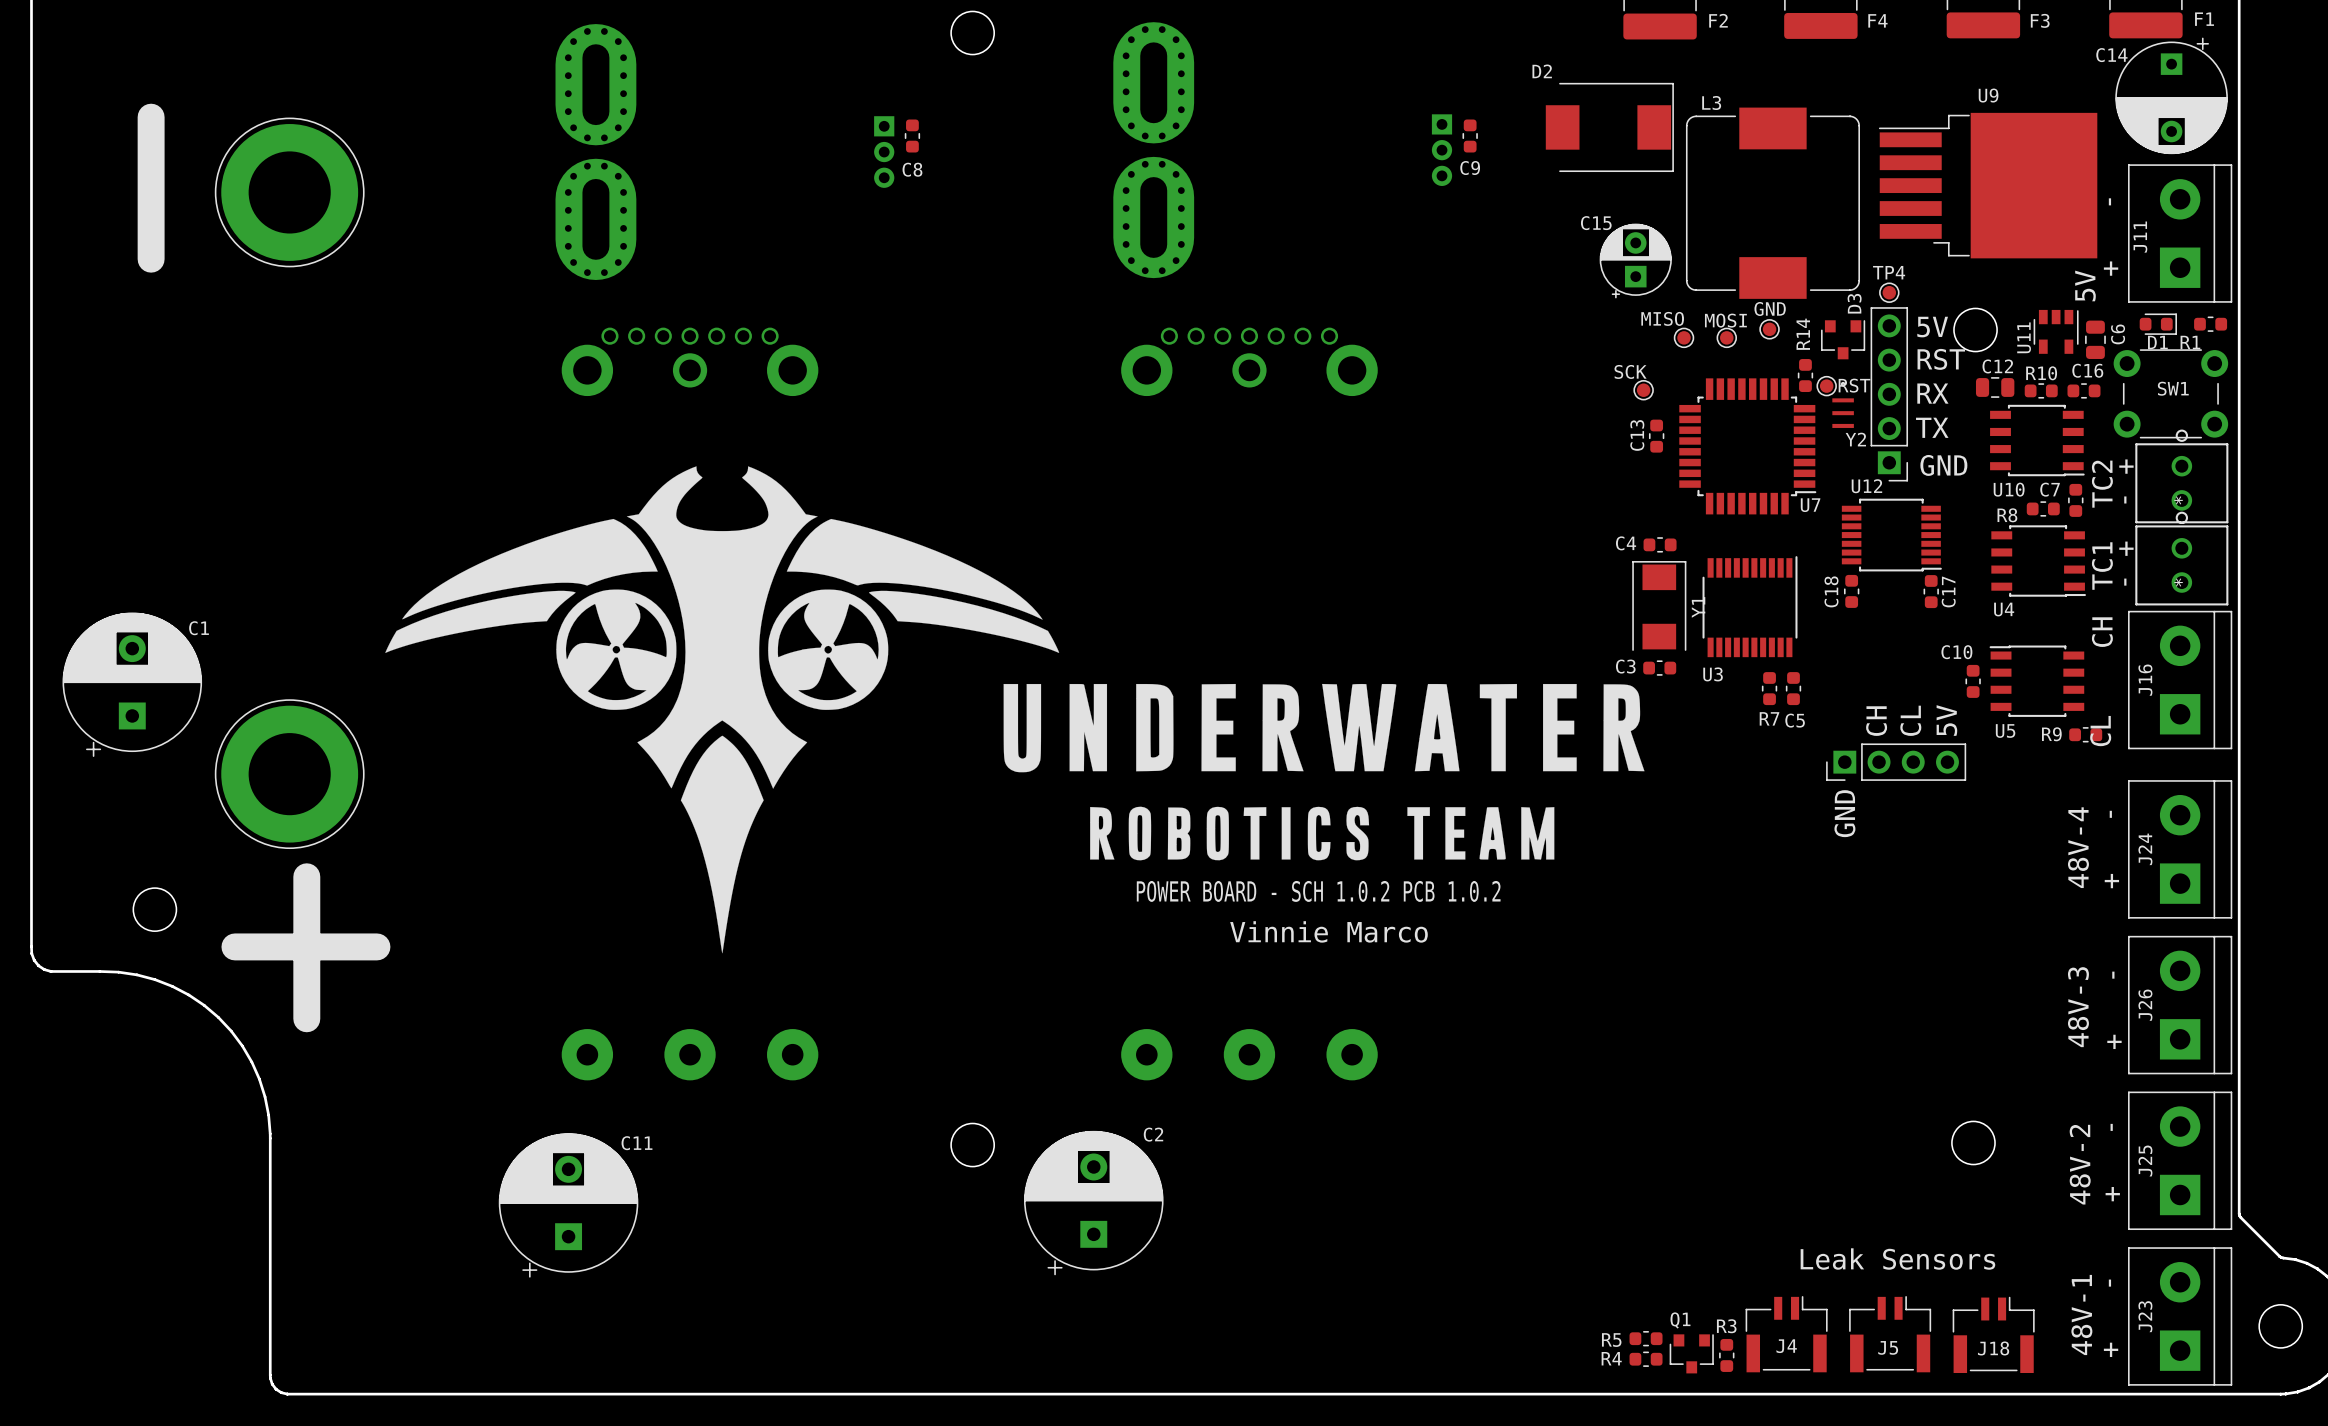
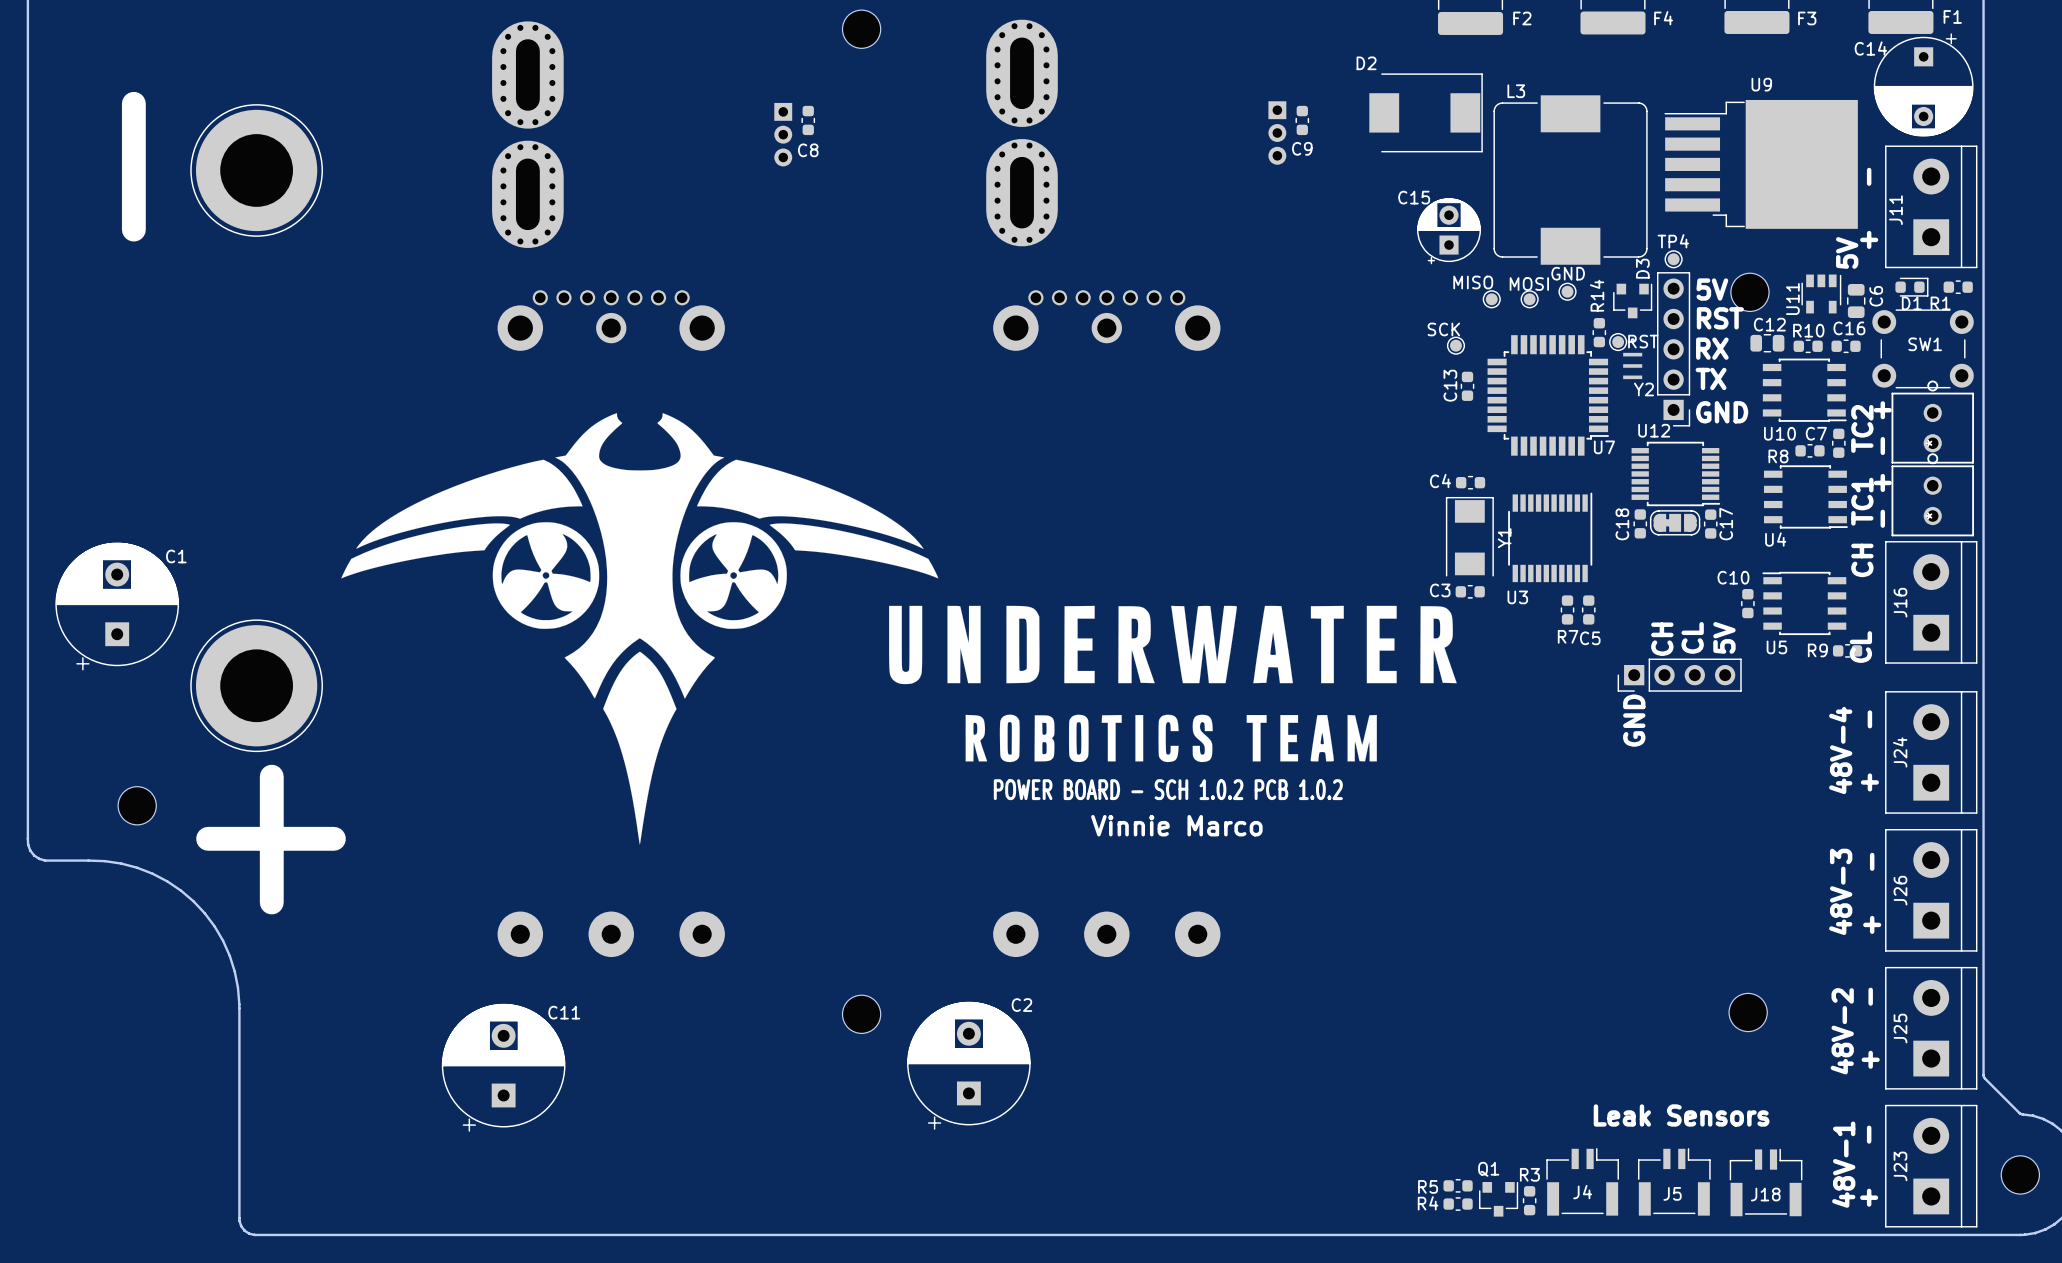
part: none -> (1675, 522)

